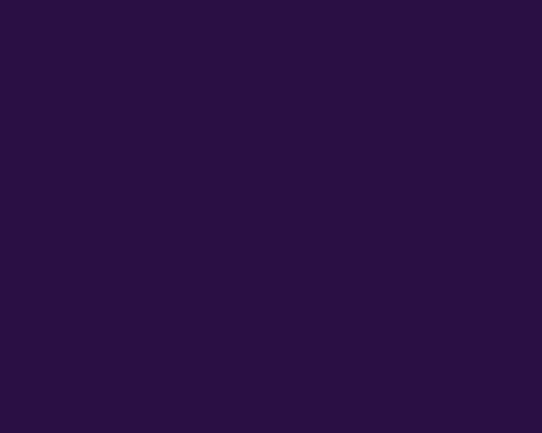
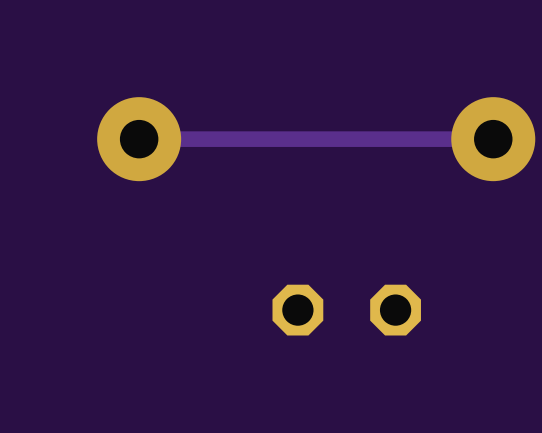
via: none -> (139, 139)
track: none -> (493, 139) (139, 139)
via: none -> (493, 139)
part: none -> (346, 310)

